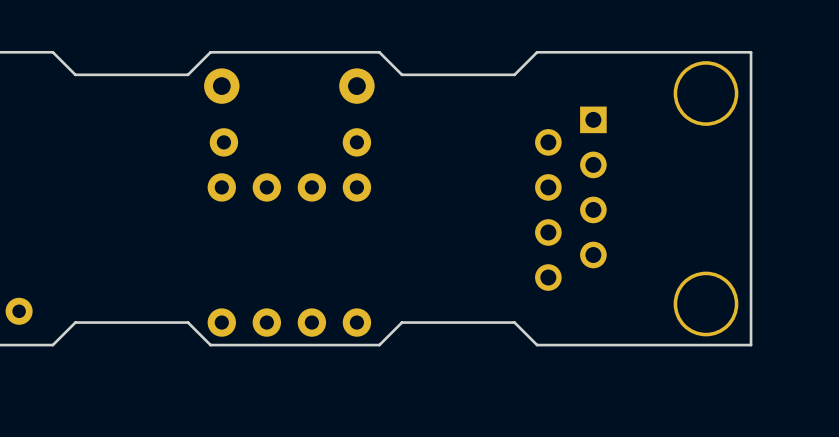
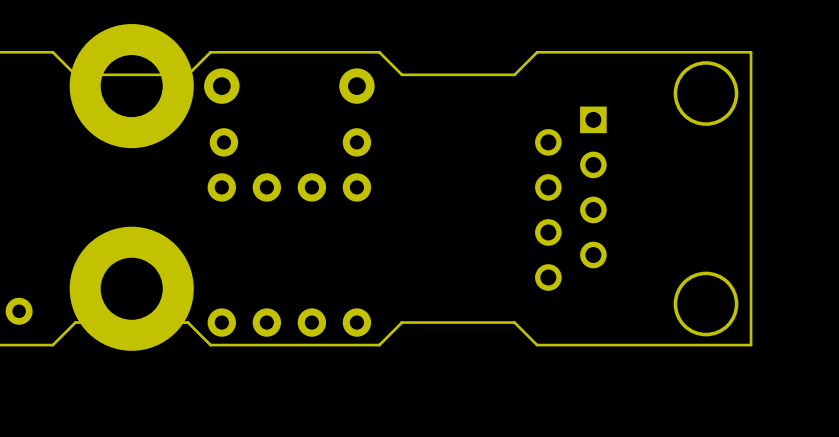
part: none -> (131, 86)
part: none -> (131, 288)

